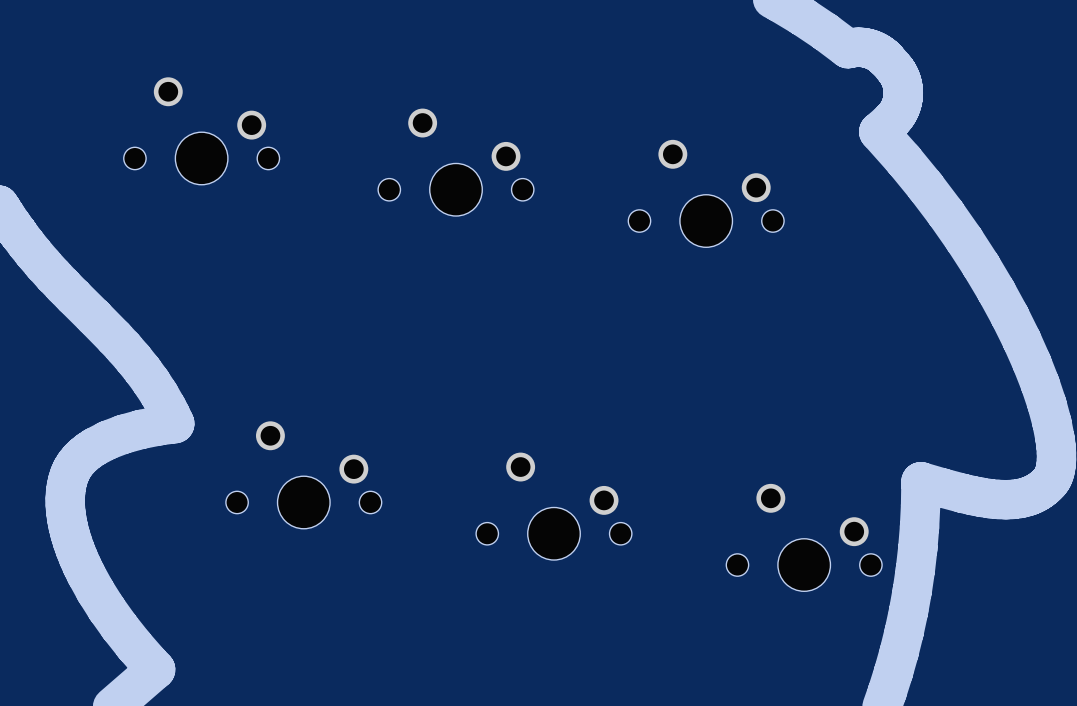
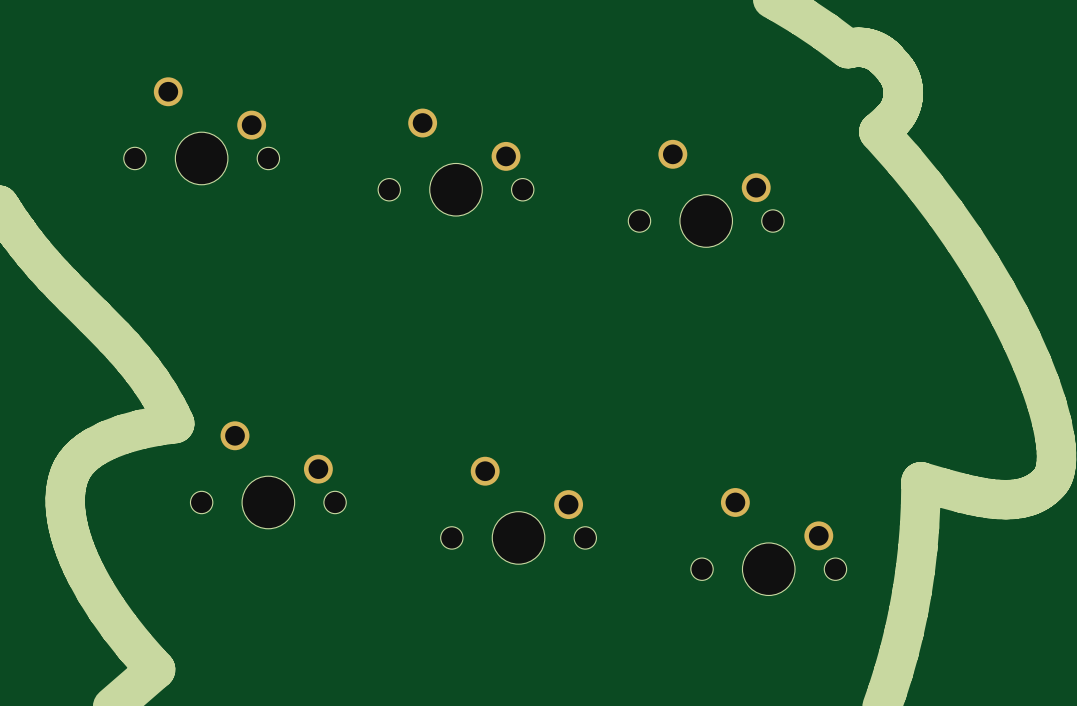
part position: (303, 475) -> (268, 475)
part position: (553, 506) -> (518, 510)
part position: (804, 537) -> (768, 541)

